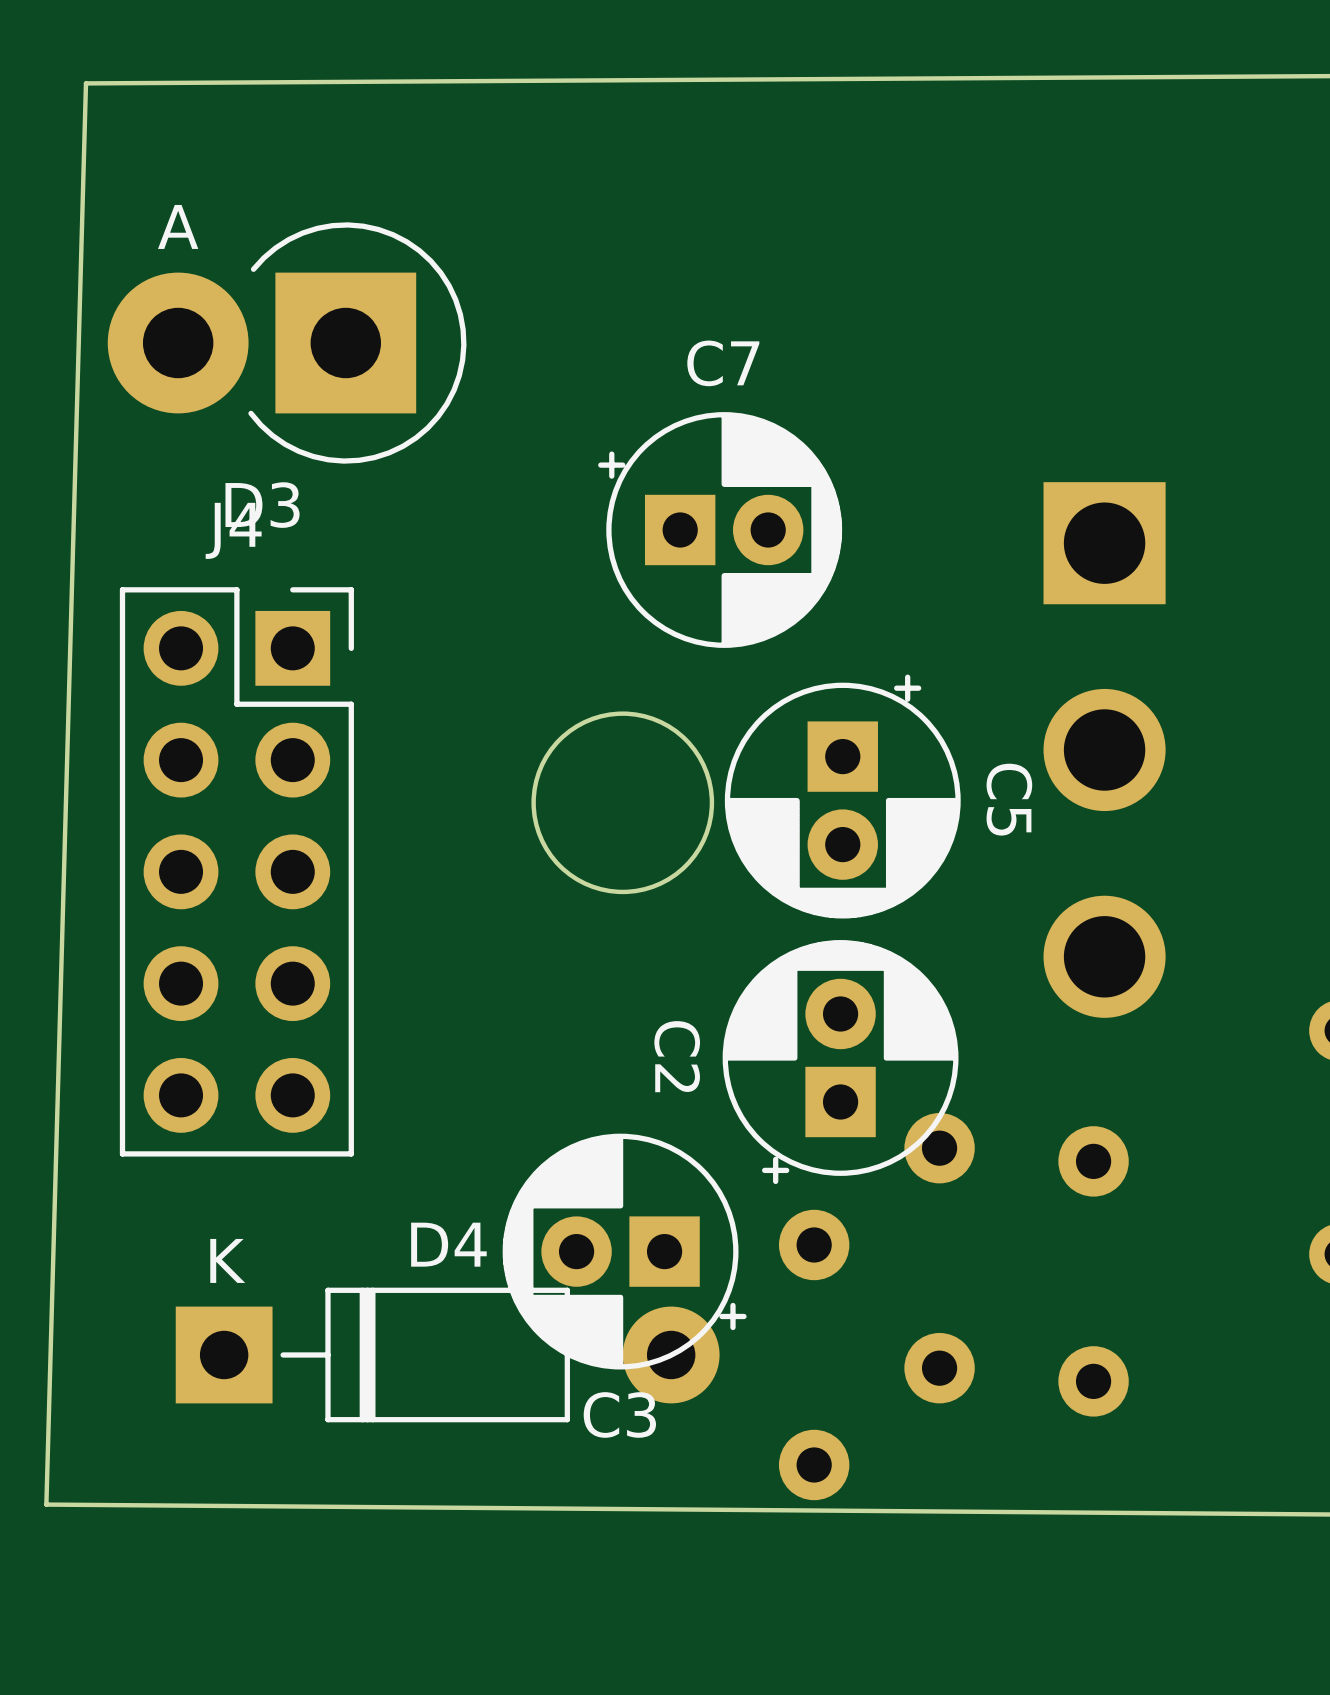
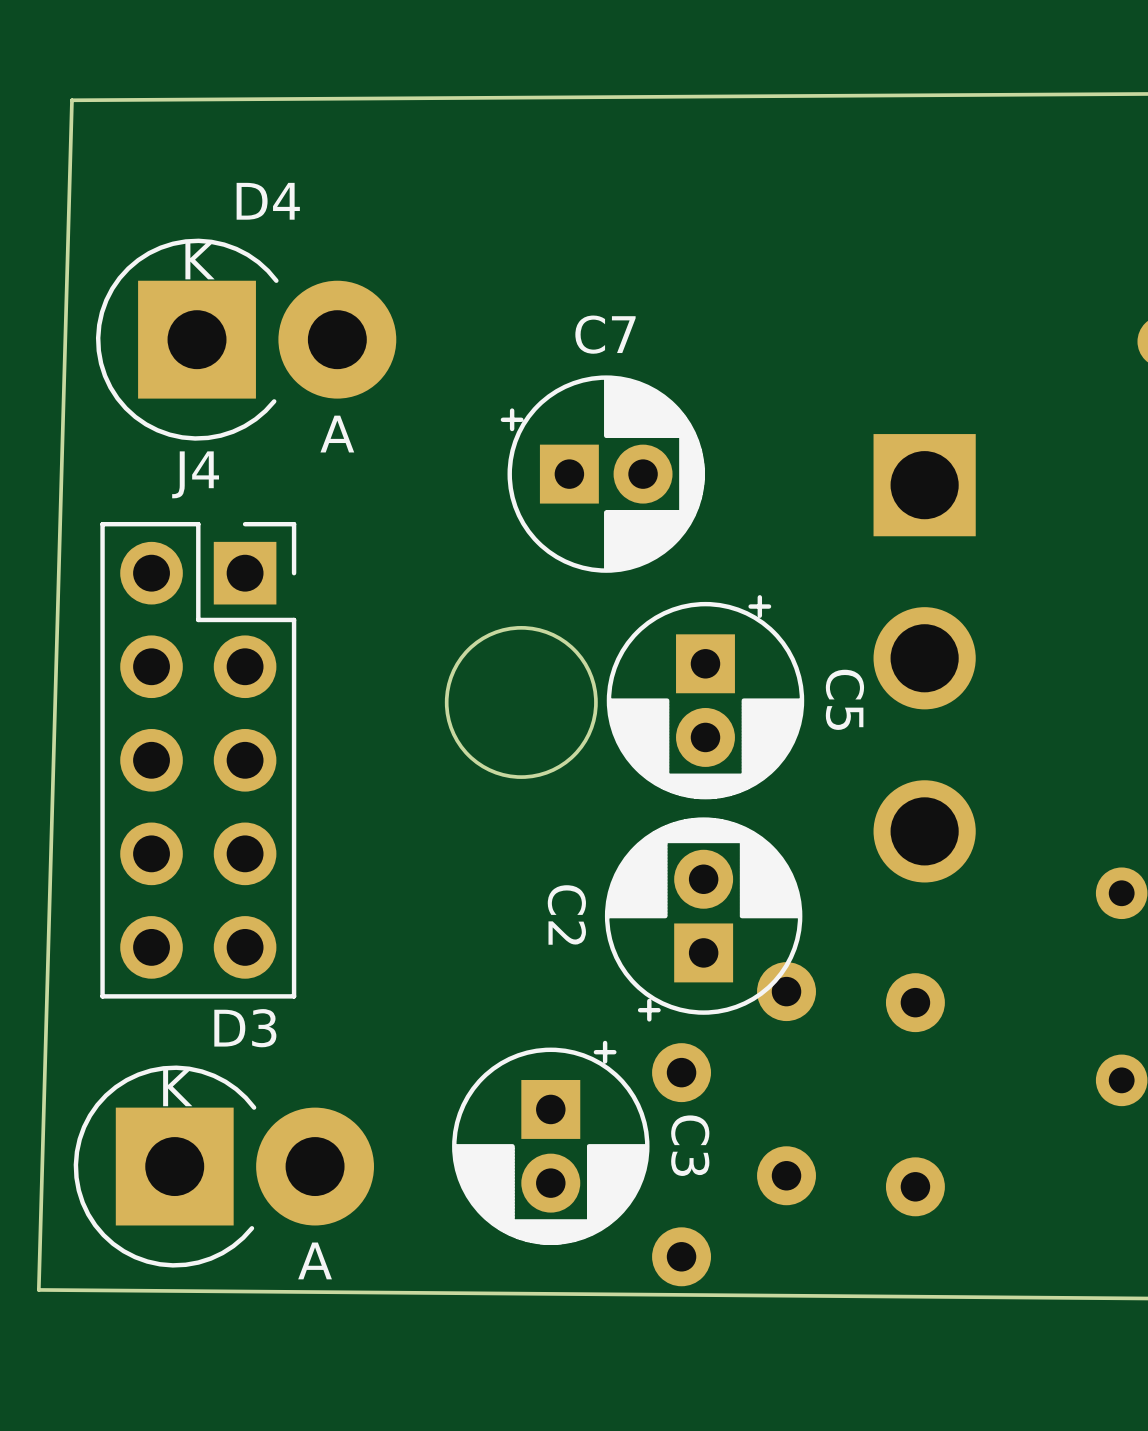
D3 footprint: [107, 222, 467, 464] -> [73, 1065, 374, 1268]
D3 name position: D3 (262, 505) -> D3 (245, 1028)
C3 rotation: 0° (624, 1251) -> 90° counterclockwise (550, 1142)
D4 footprint: [175, 1287, 720, 1423] -> [95, 238, 397, 441]

